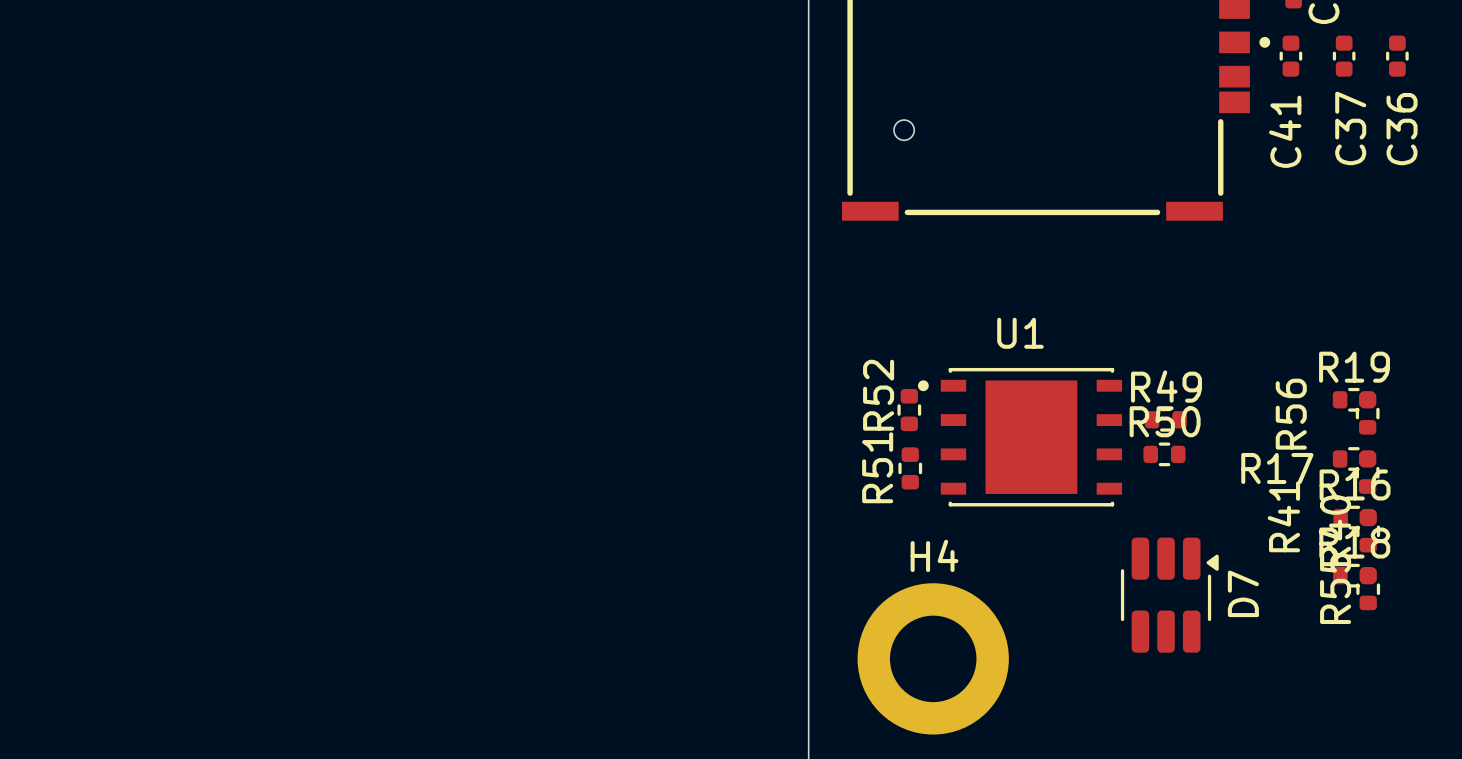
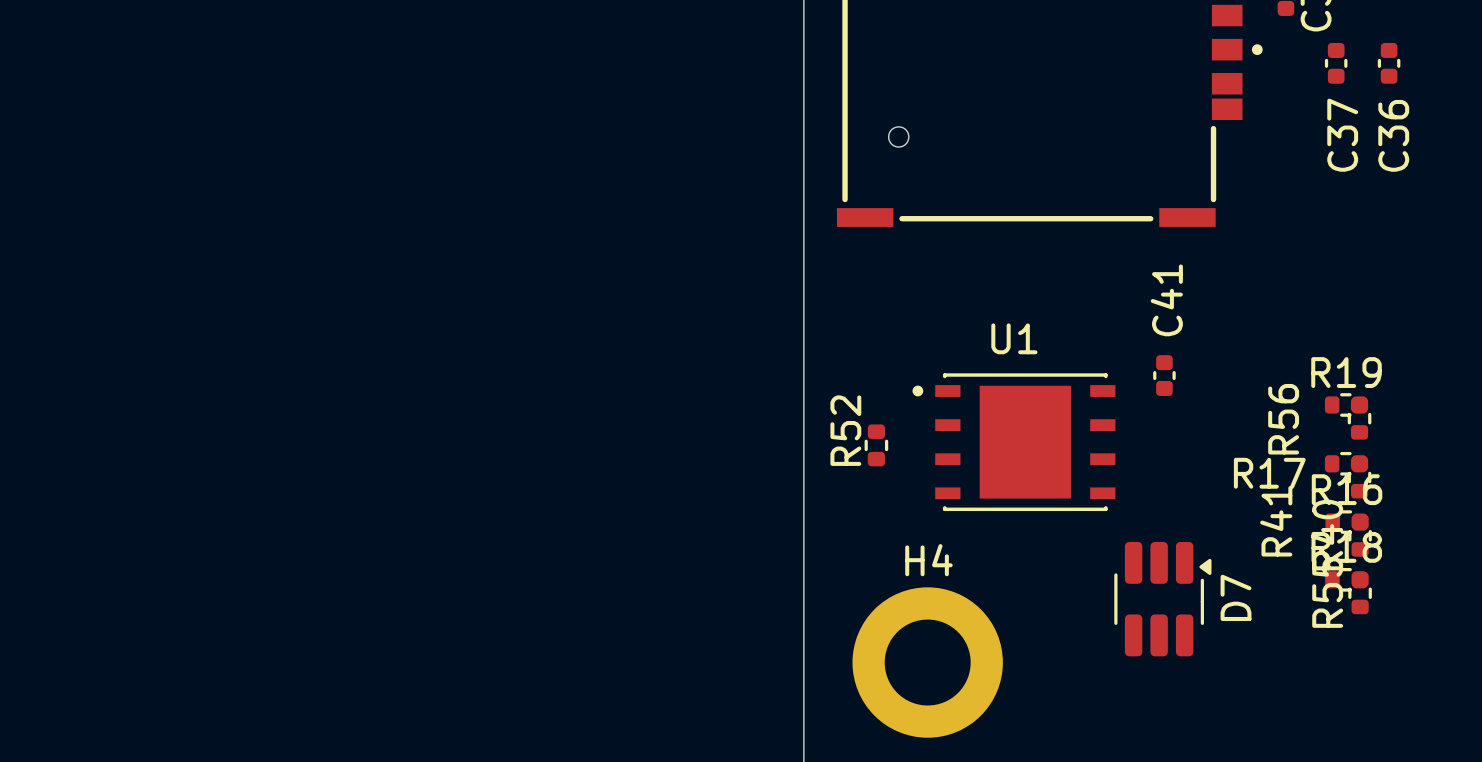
C41 position: (1290, 56) -> (1164, 375)
C41 name position: C41 (1285, 131) -> C41 (1166, 300)
R52 position: (909, 410) -> (876, 445)
R49: (1165, 419) -> none
R50: (1164, 454) -> none
R51: (910, 468) -> none

